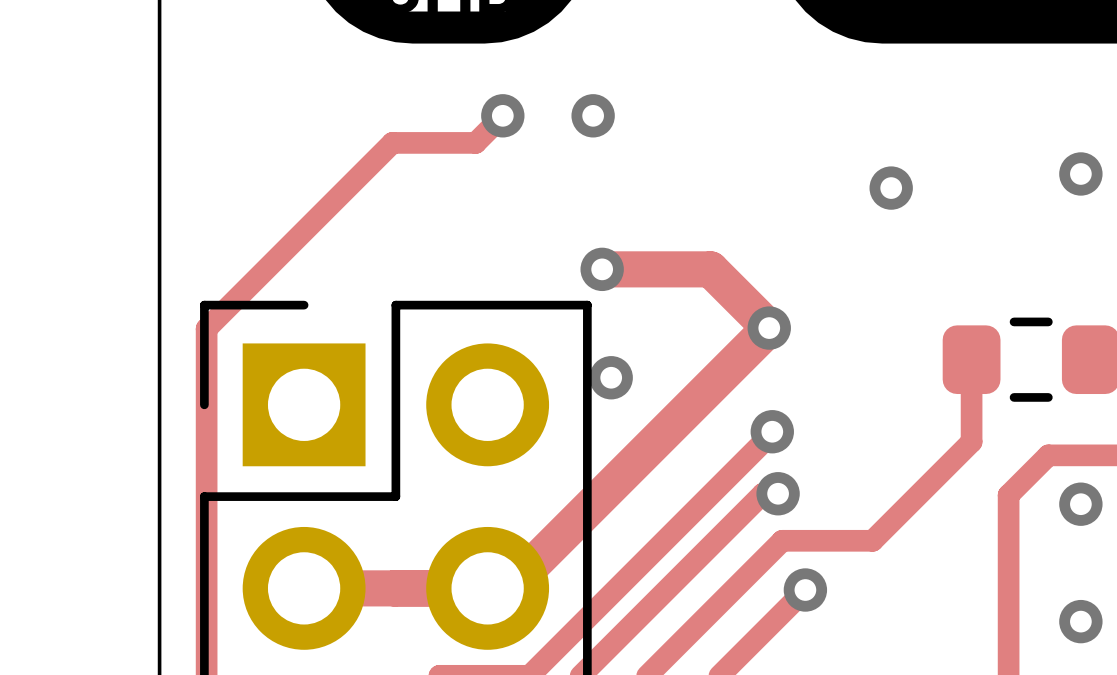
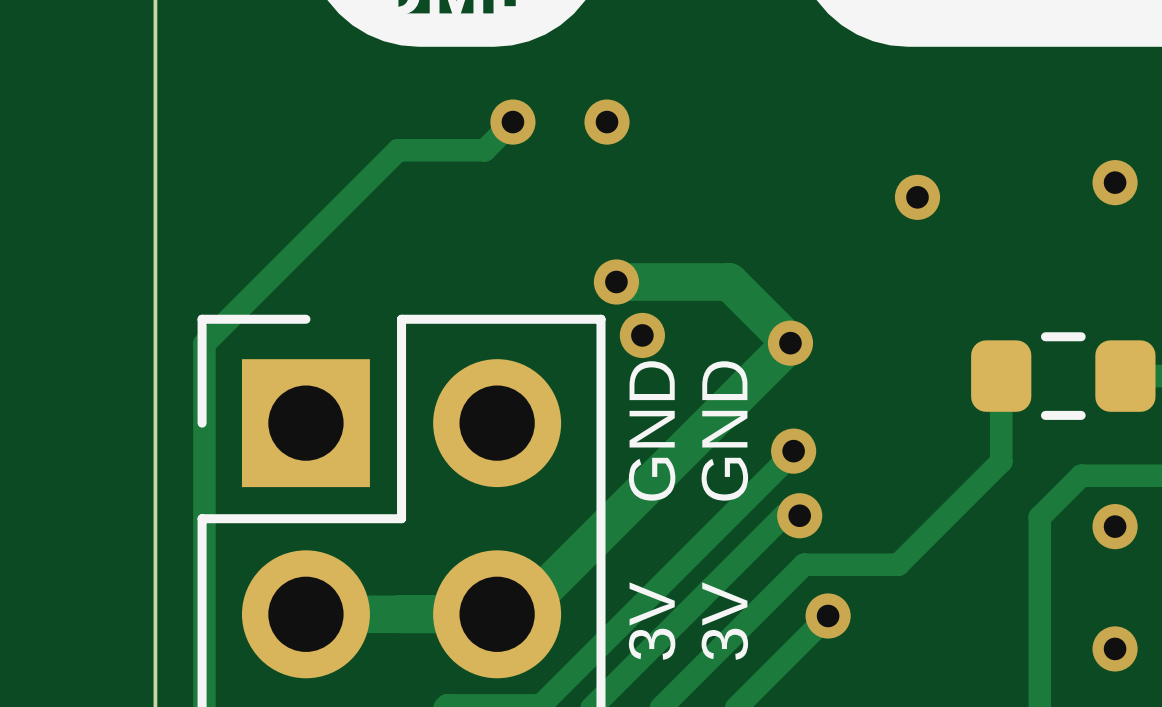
via position: (611, 377) -> (642, 335)
text: none -> GND (652, 430)
text: none -> GND (724, 430)
text: none -> 3V (652, 621)
text: none -> 3V (724, 621)

